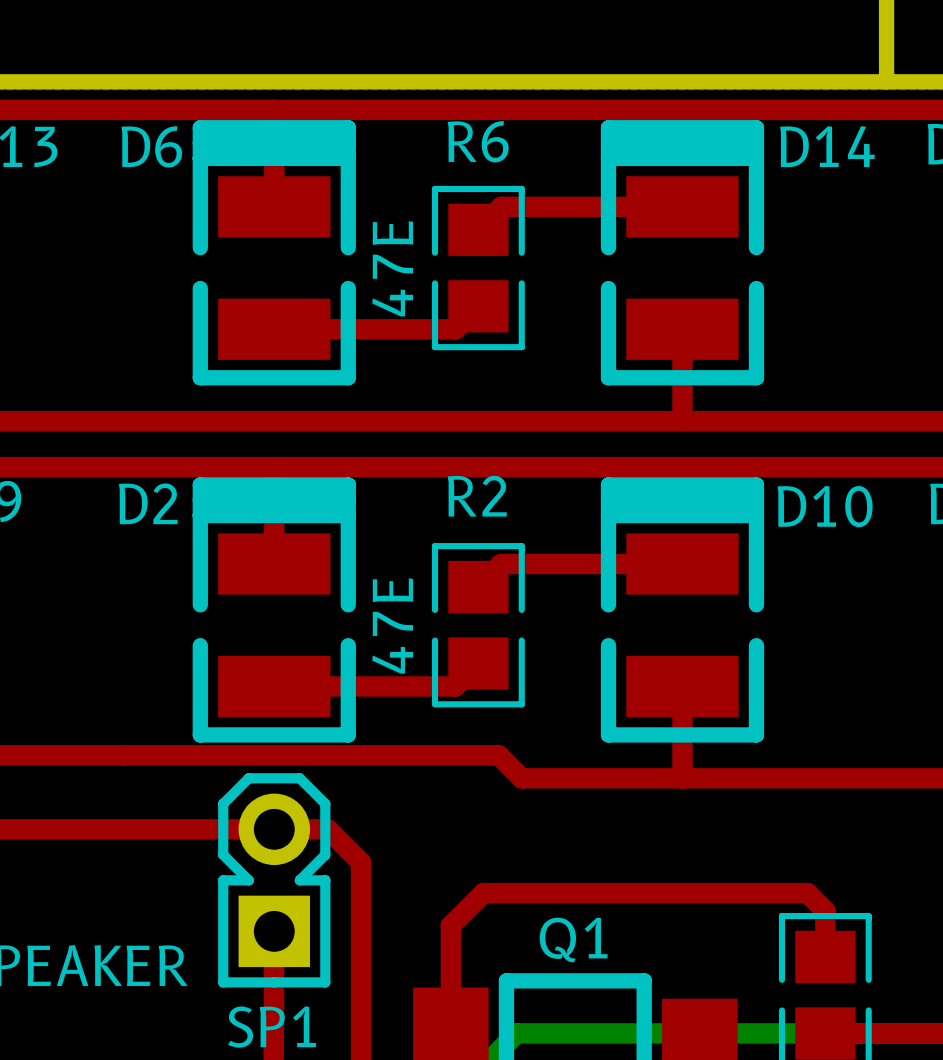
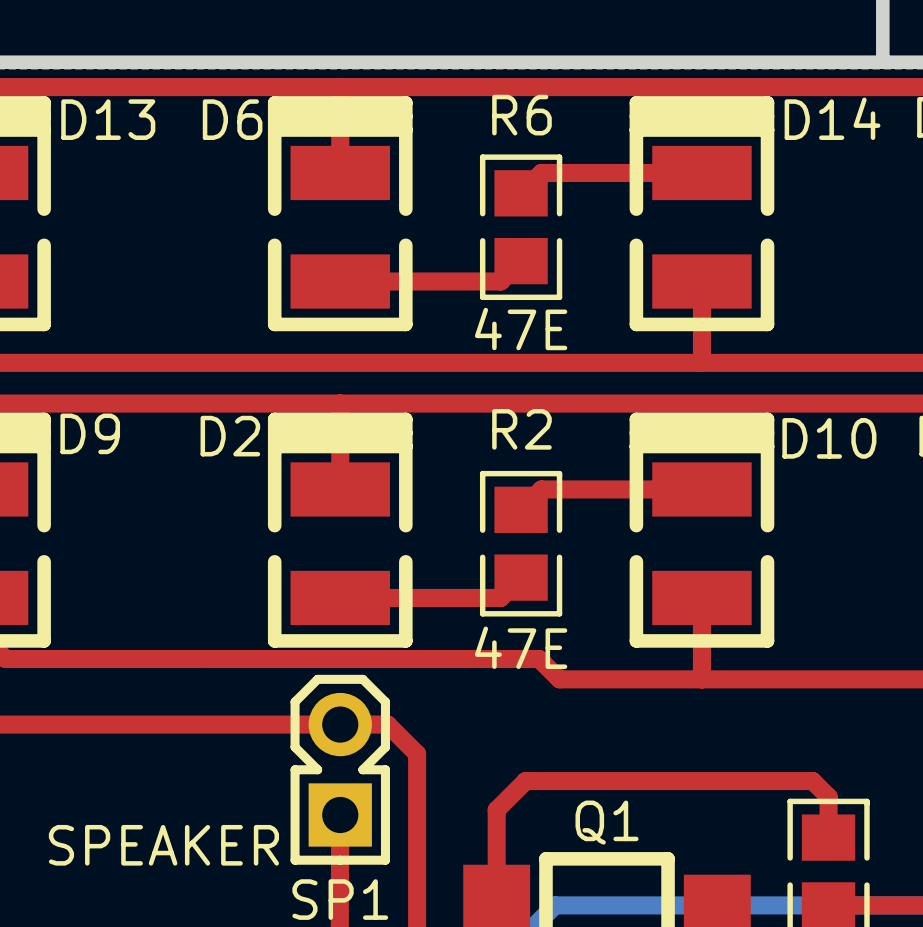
R6 value rotation: 0° (392, 268) -> 90° clockwise (521, 329)
R6 value position: 47E (392, 268) -> 47E (521, 329)
R2 value rotation: 0° (392, 625) -> 90° clockwise (521, 647)
R2 value position: 47E (392, 625) -> 47E (521, 647)

